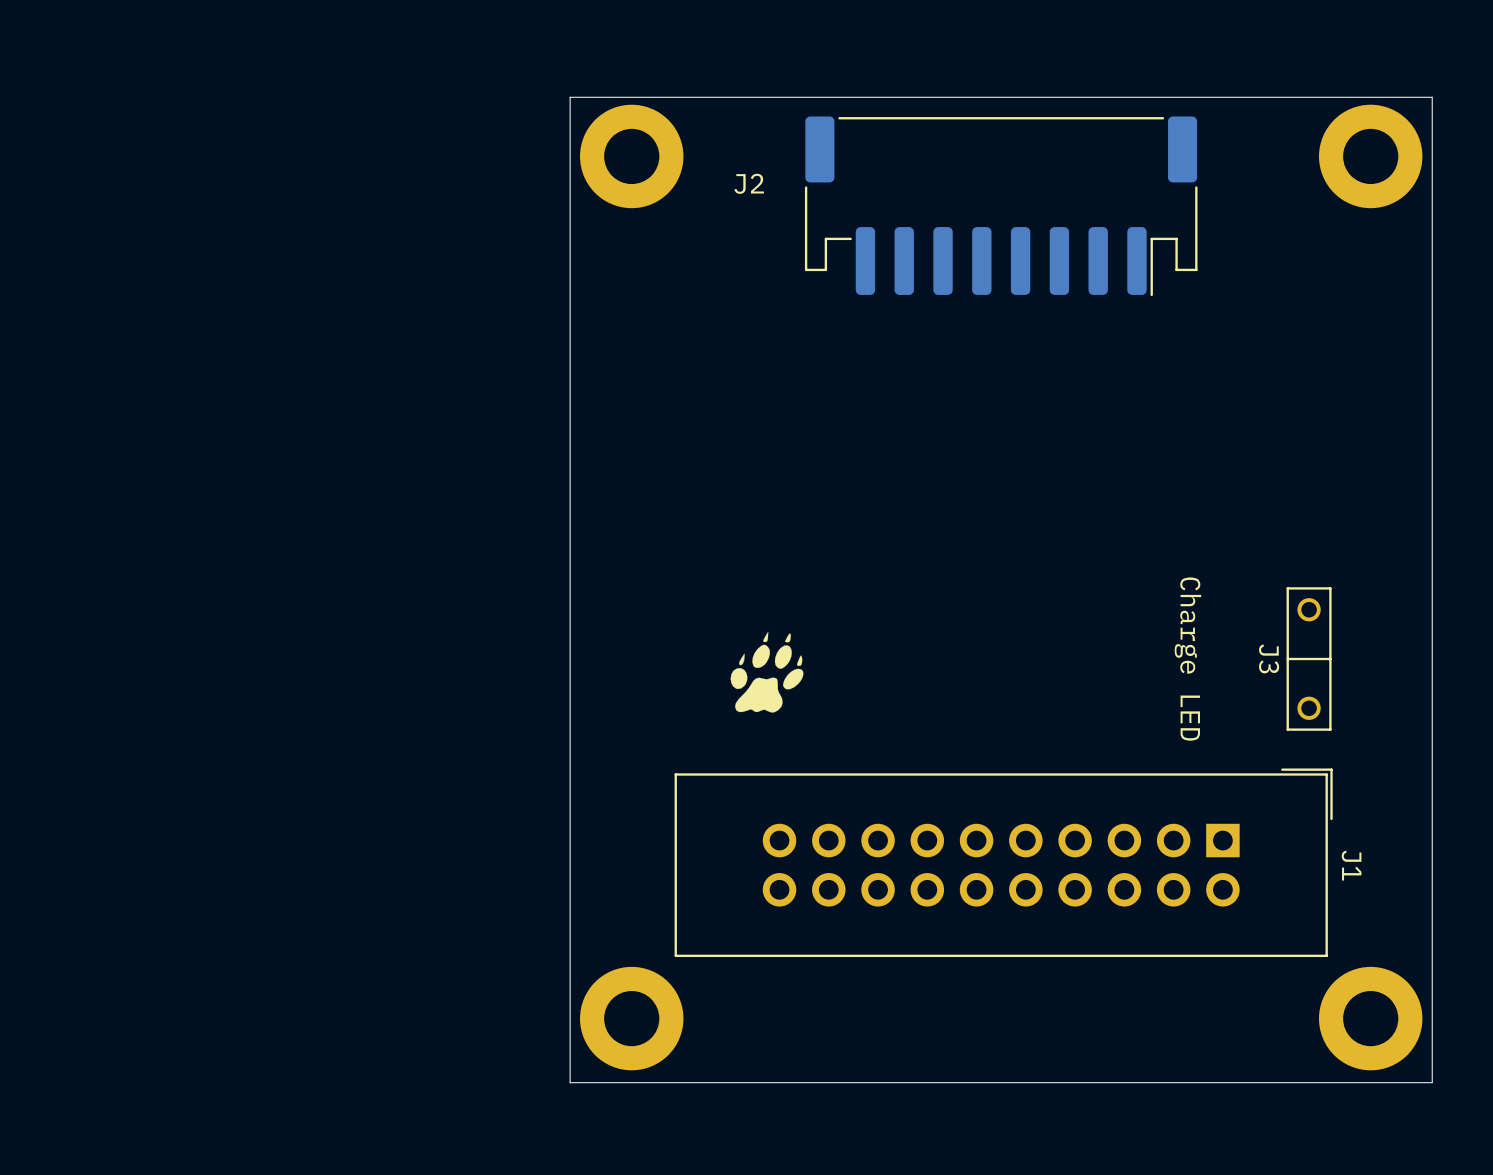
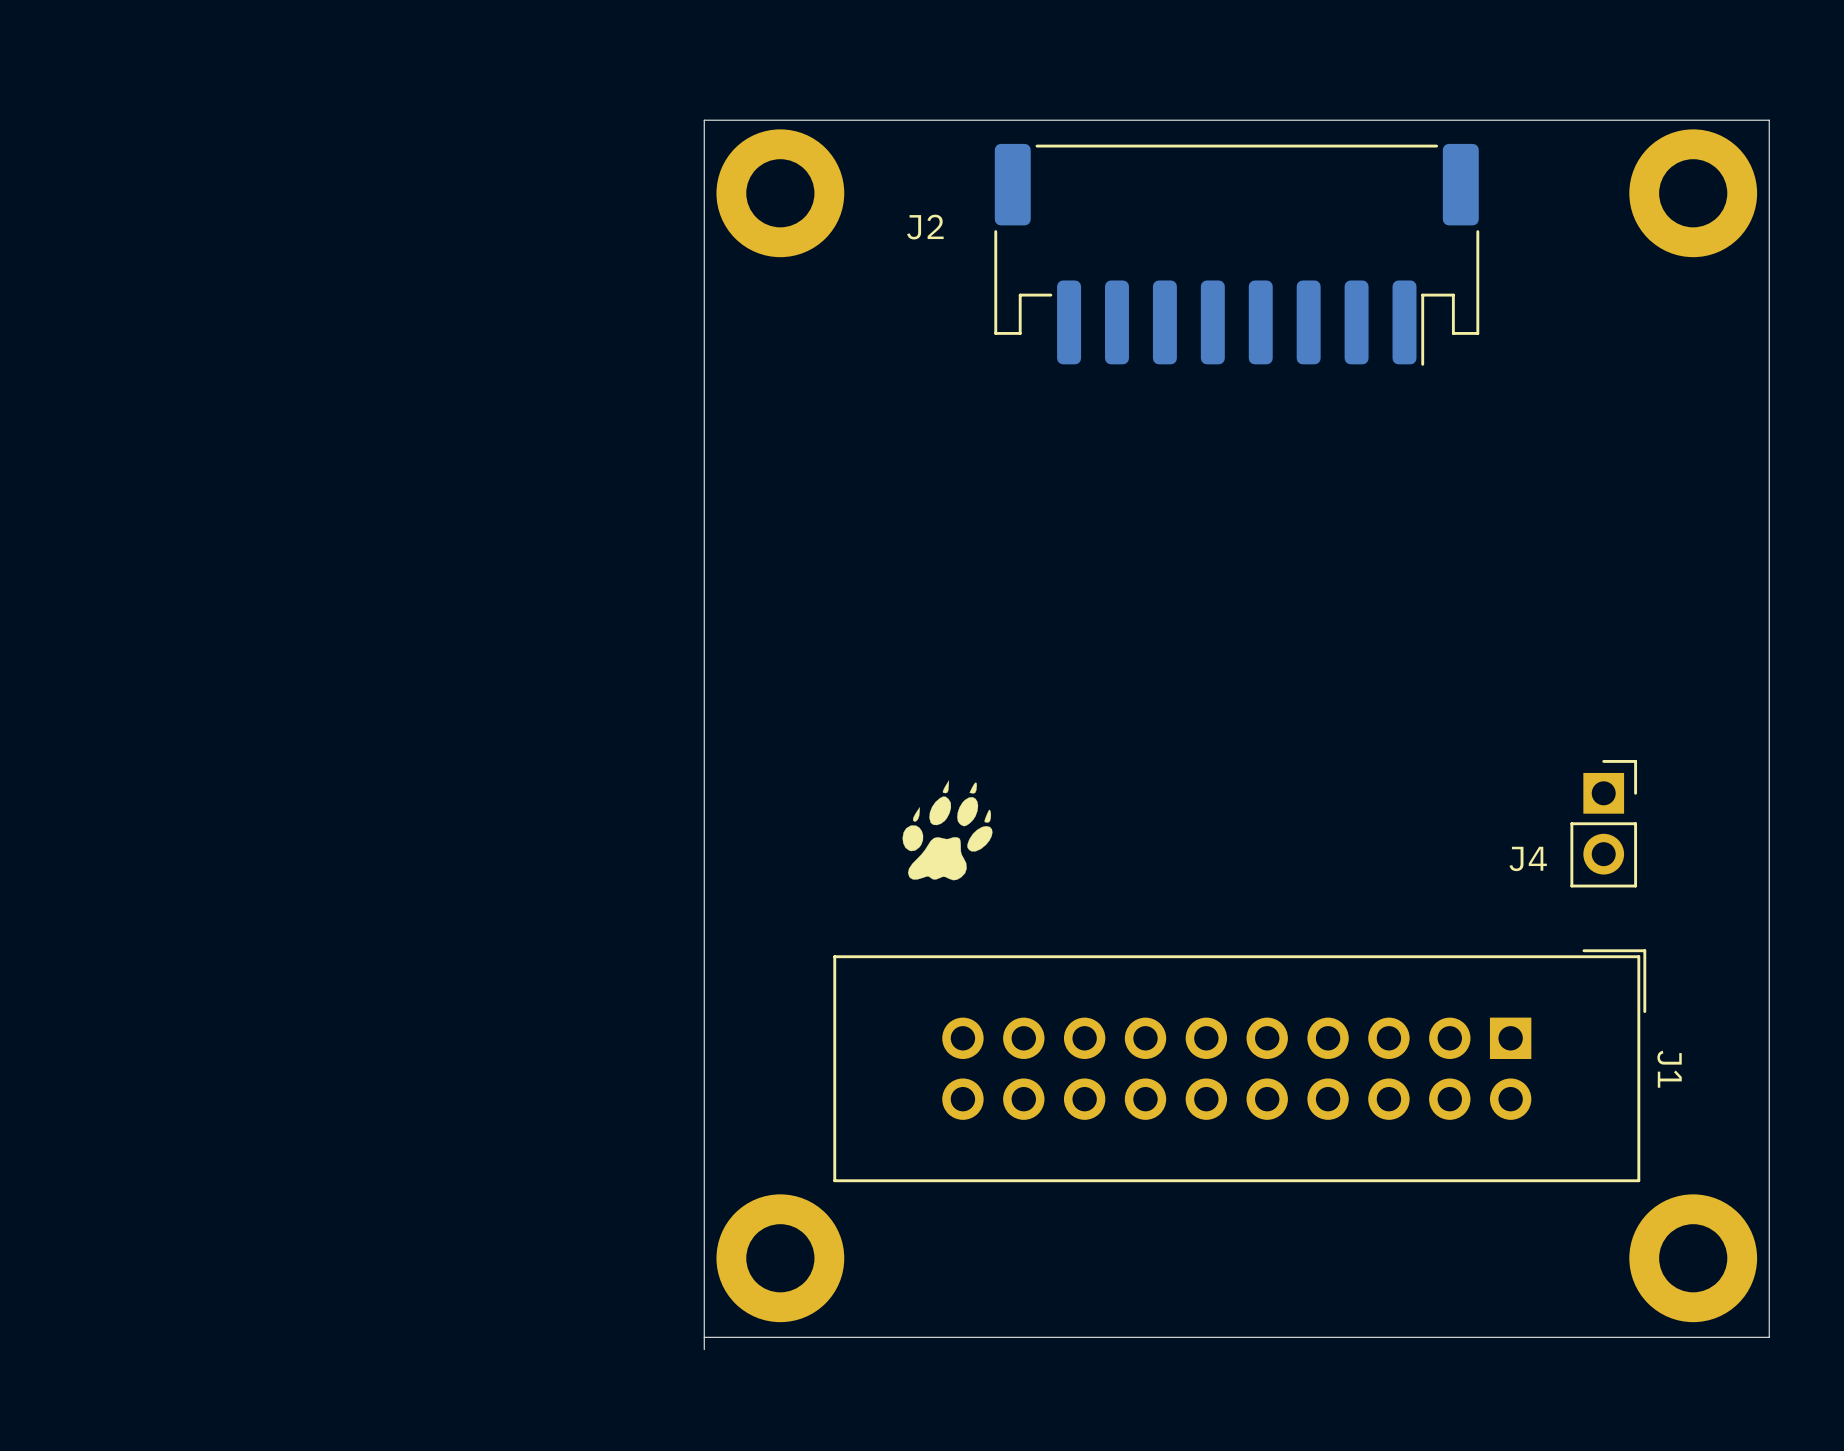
J3: Charge LED (1309, 659) -> none
J4: none -> (1603, 823)
board edge: none -> (704, 1337) (704, 1349)

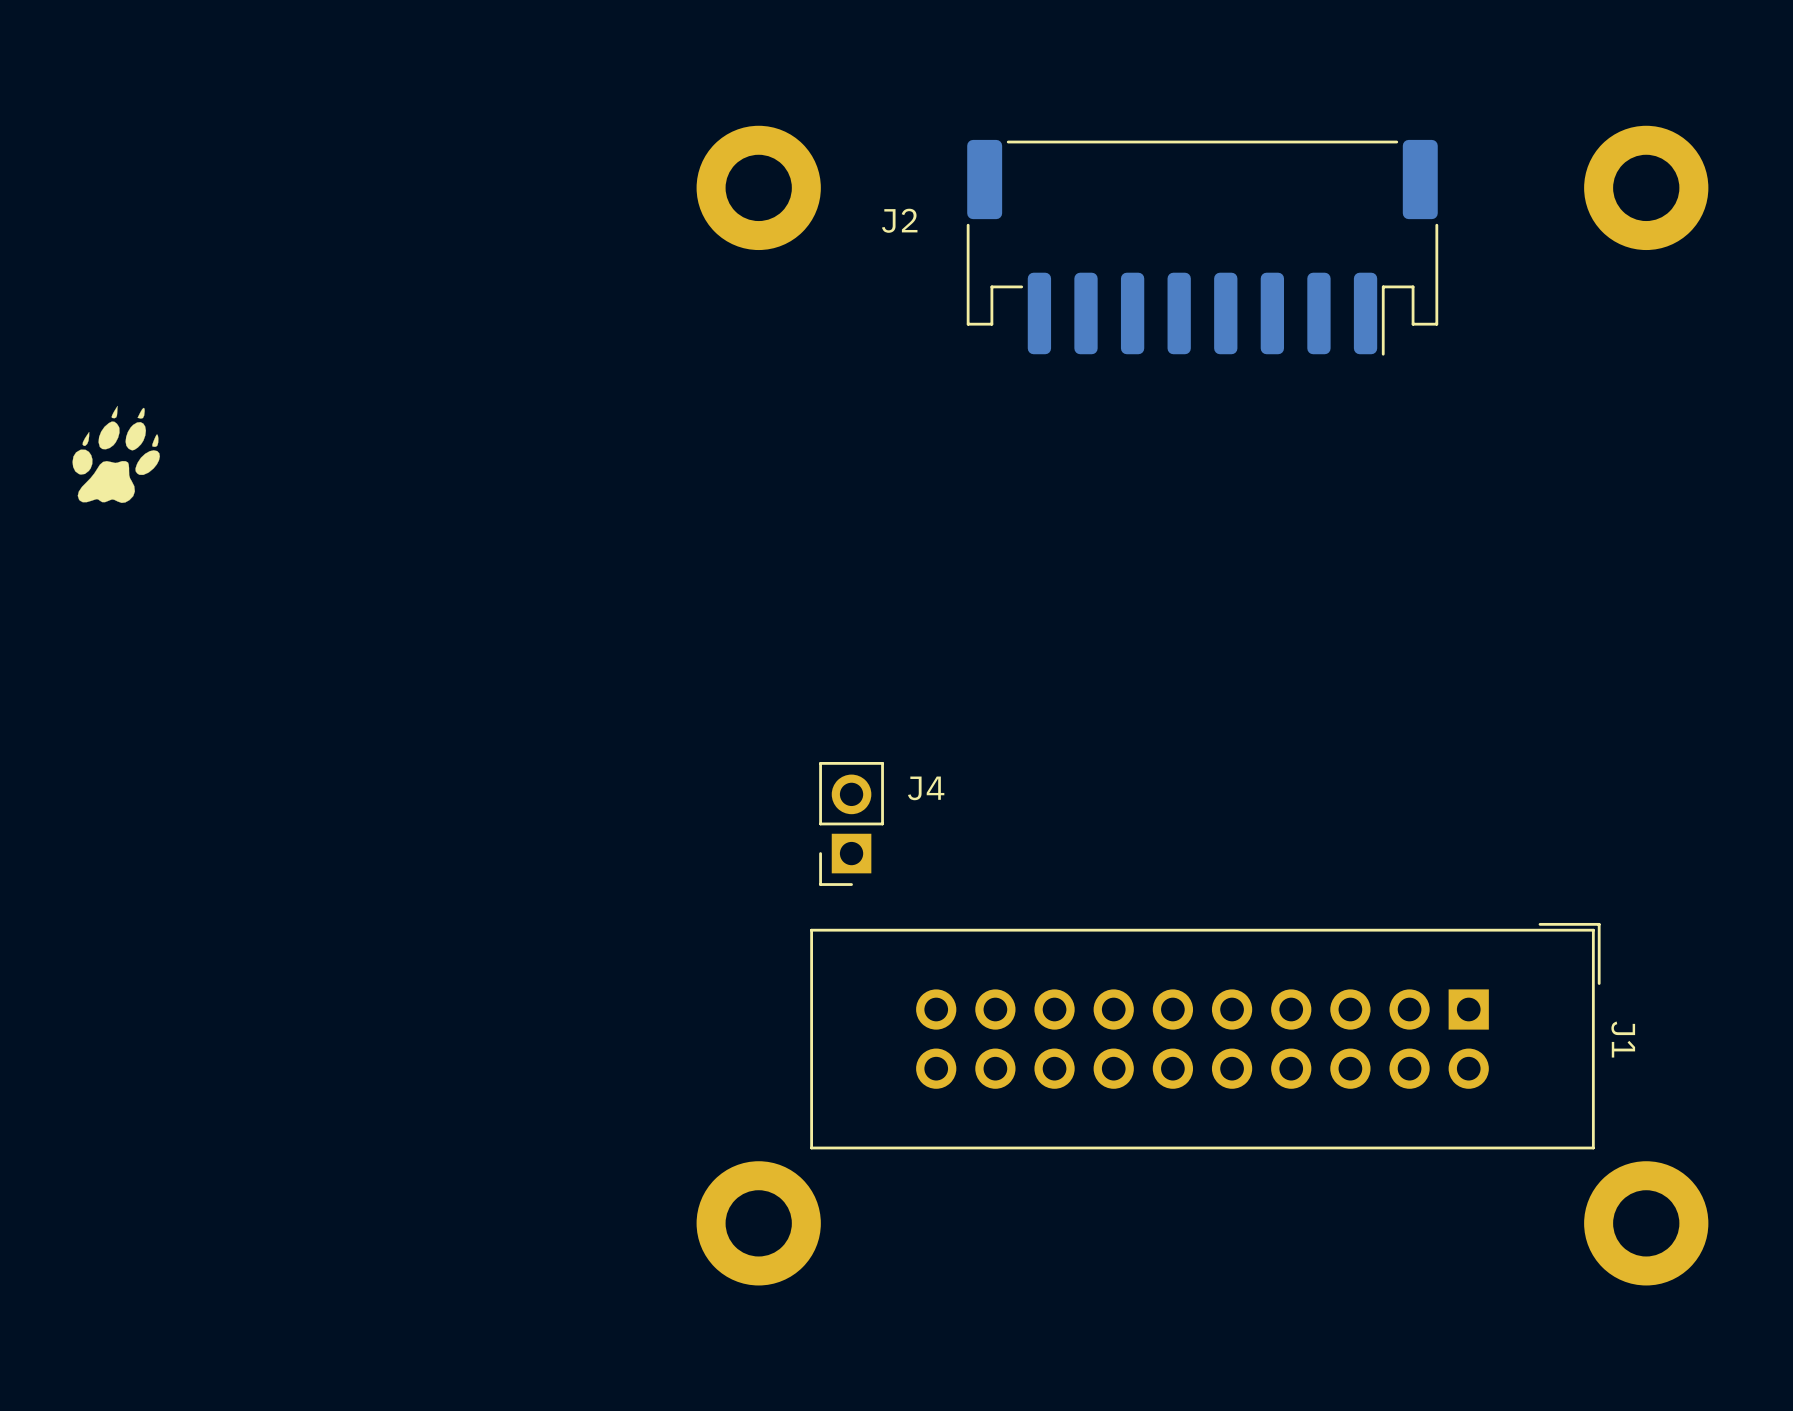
drawing: none -> [72, 405, 160, 503]
drawing: [902, 780, 993, 881] -> none
J4 rotation: 0° (1603, 823) -> 180° (851, 823)
J4 position: (1603, 823) -> (851, 823)
board edge: (704, 1337) (1769, 1337) (1769, 120) (704, 120) (704, 1349) -> none

